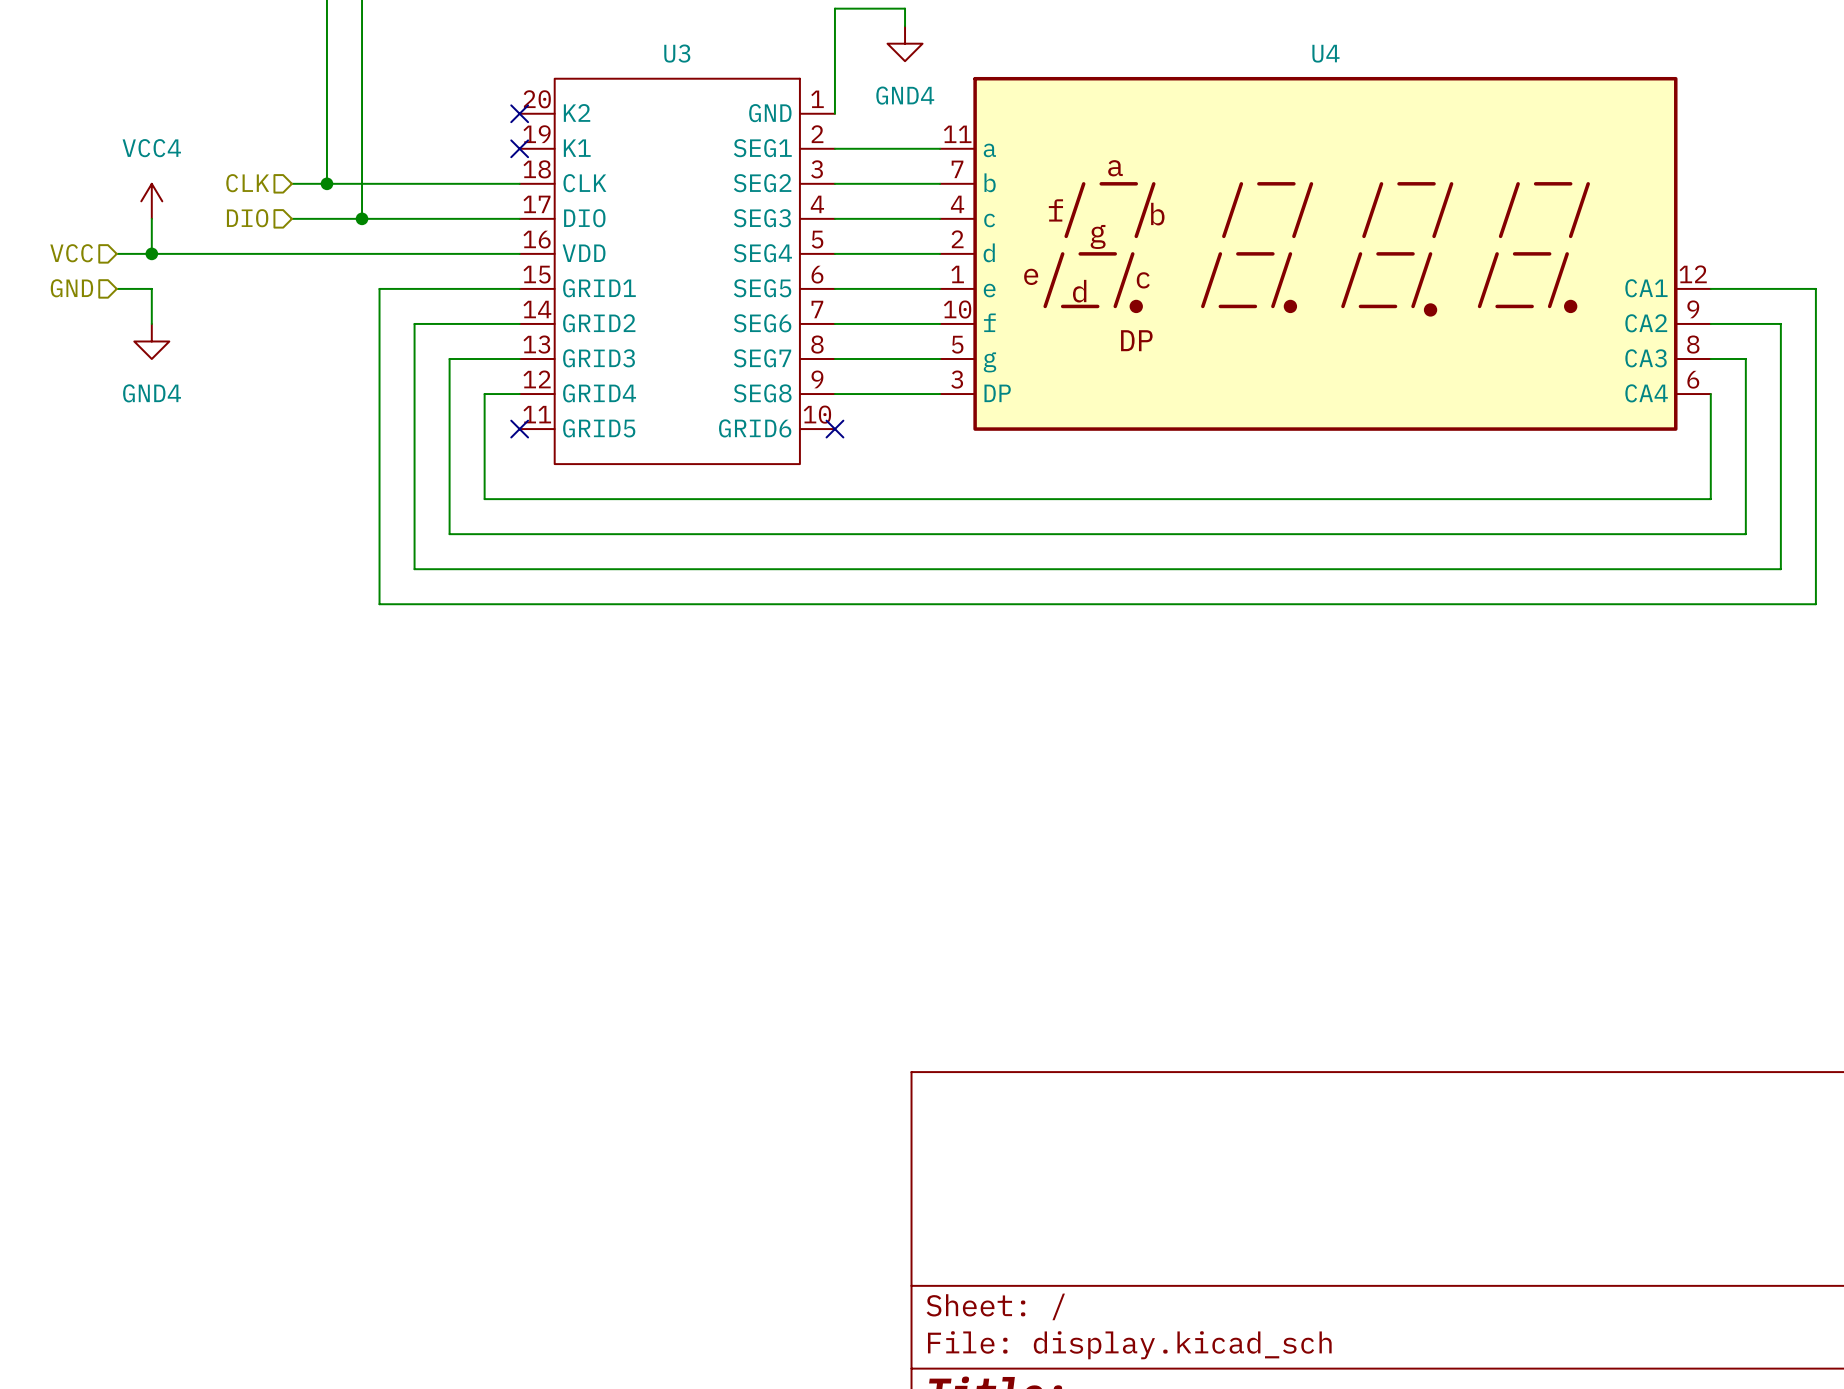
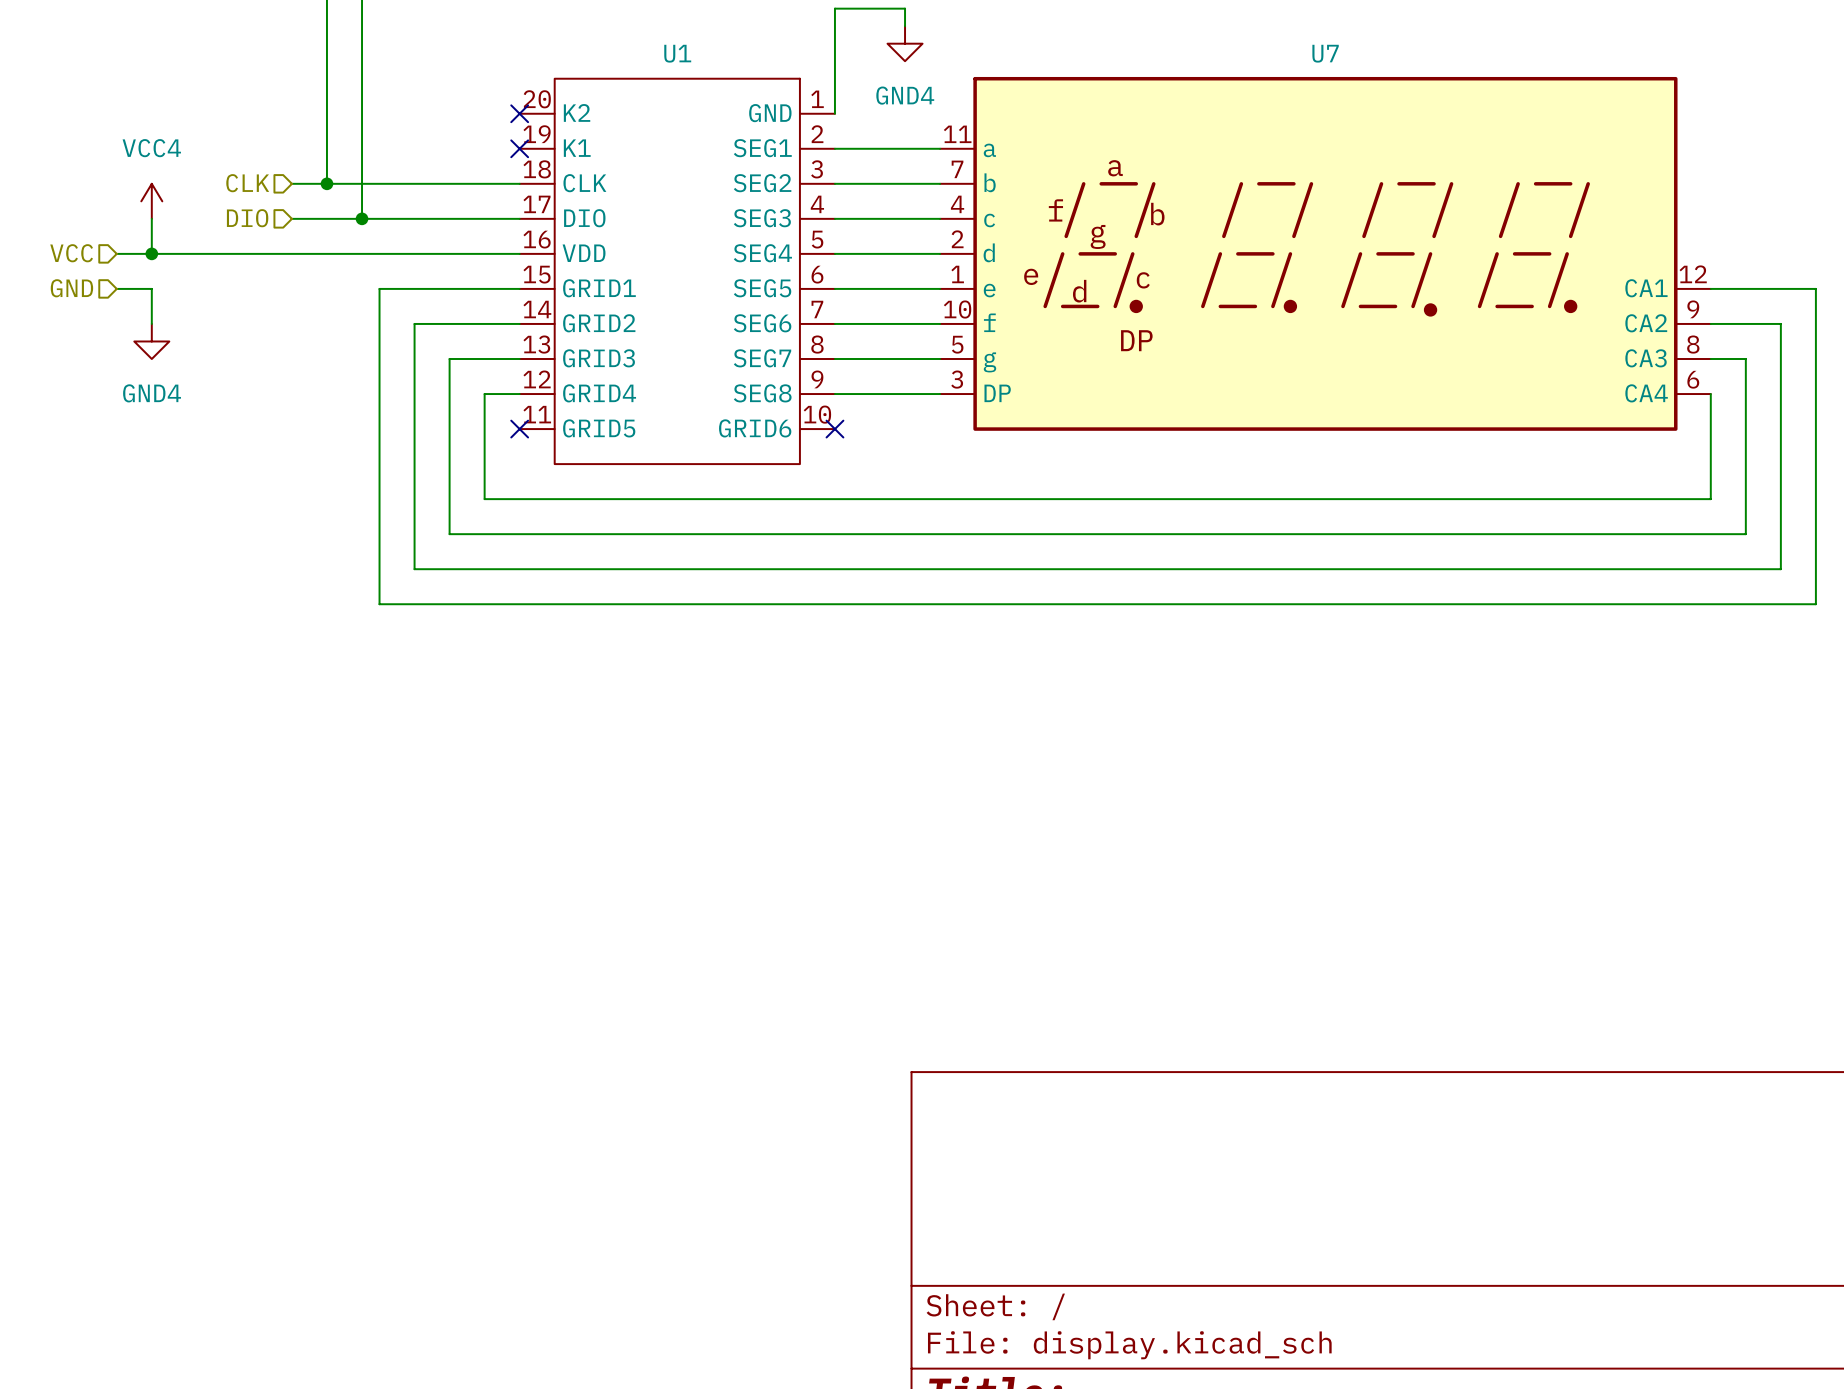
U3 name: U3 (677, 53) -> U1 (677, 53)
U4 name: U4 (1325, 53) -> U7 (1325, 53)

